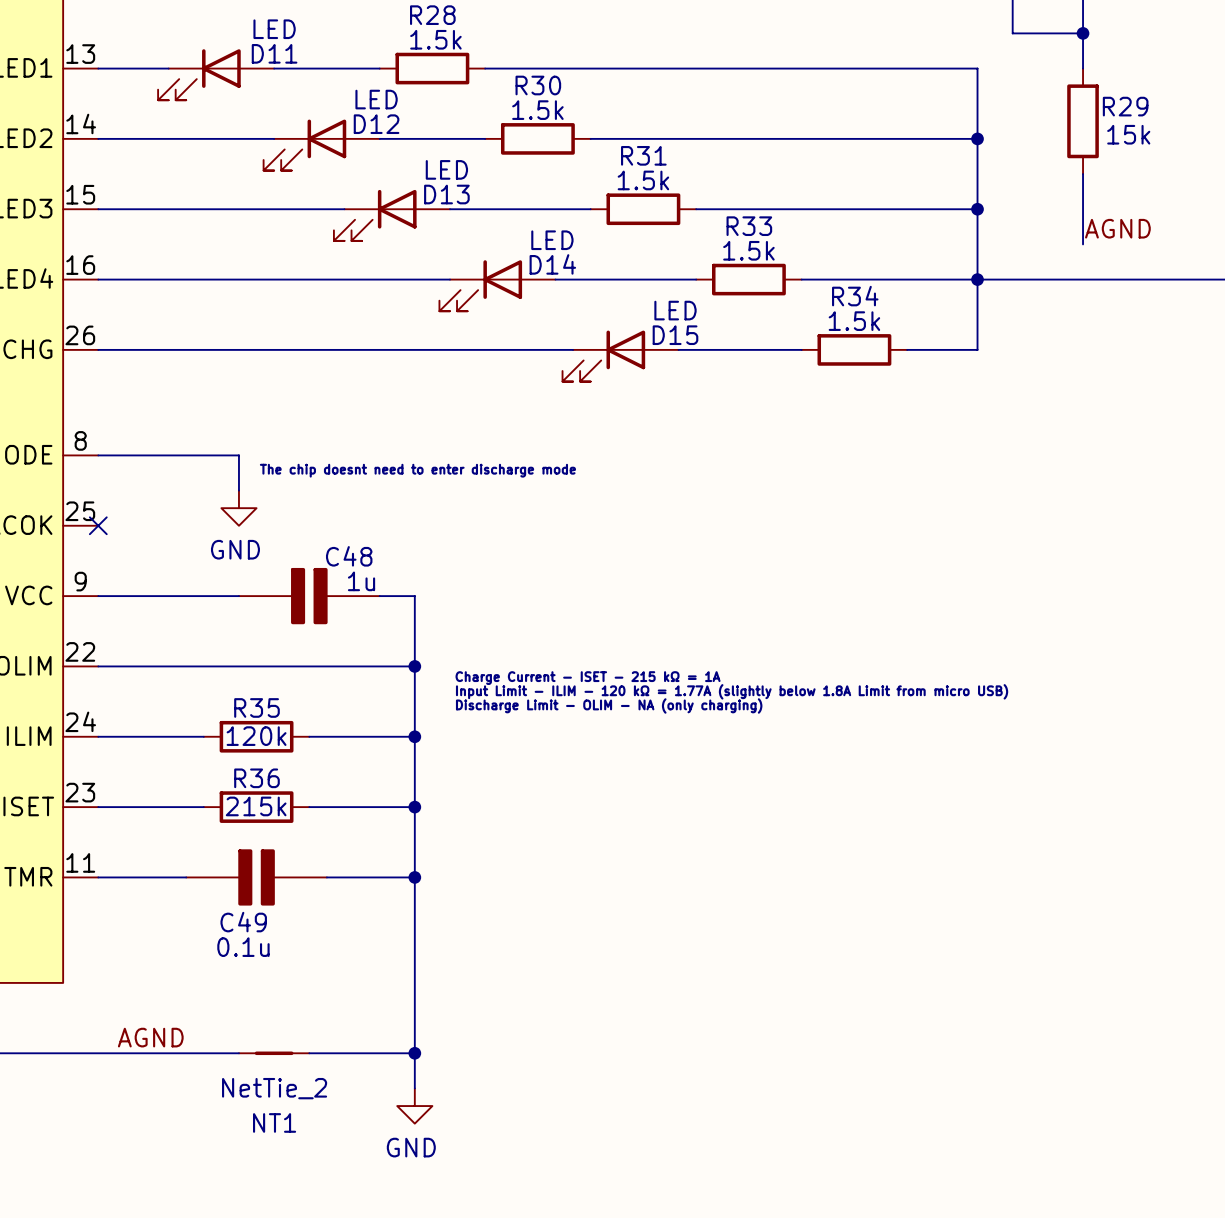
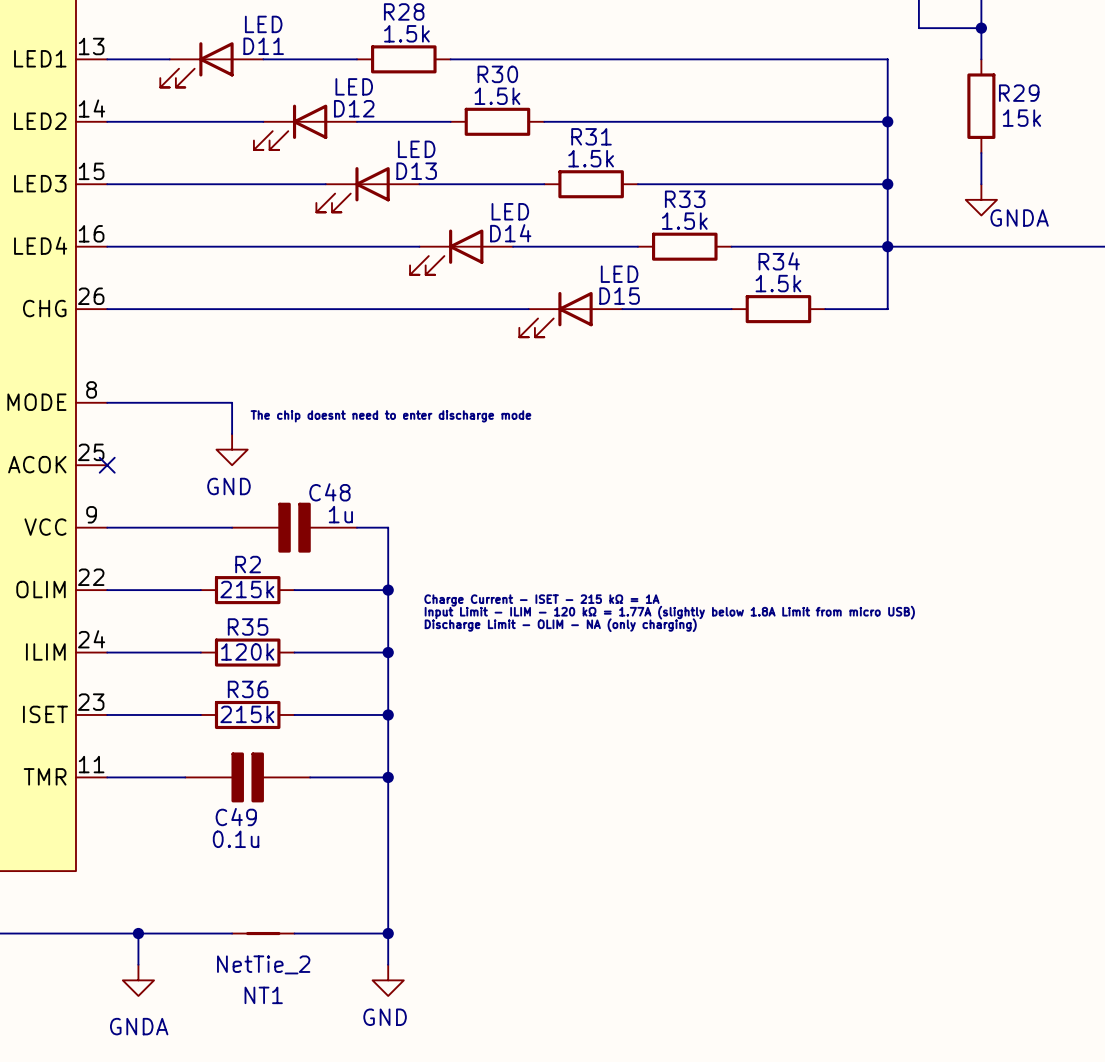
power symbol: none -> GNDA (981, 199)
label: AGND (1117, 228) -> none
wire: (203, 666) (309, 666) -> none
R2: none -> 215k (247, 590)
label: AGND (150, 1037) -> none
wire: none -> (138, 933) (138, 964)
junction: none -> (138, 933)
power symbol: none -> GNDA (138, 980)

